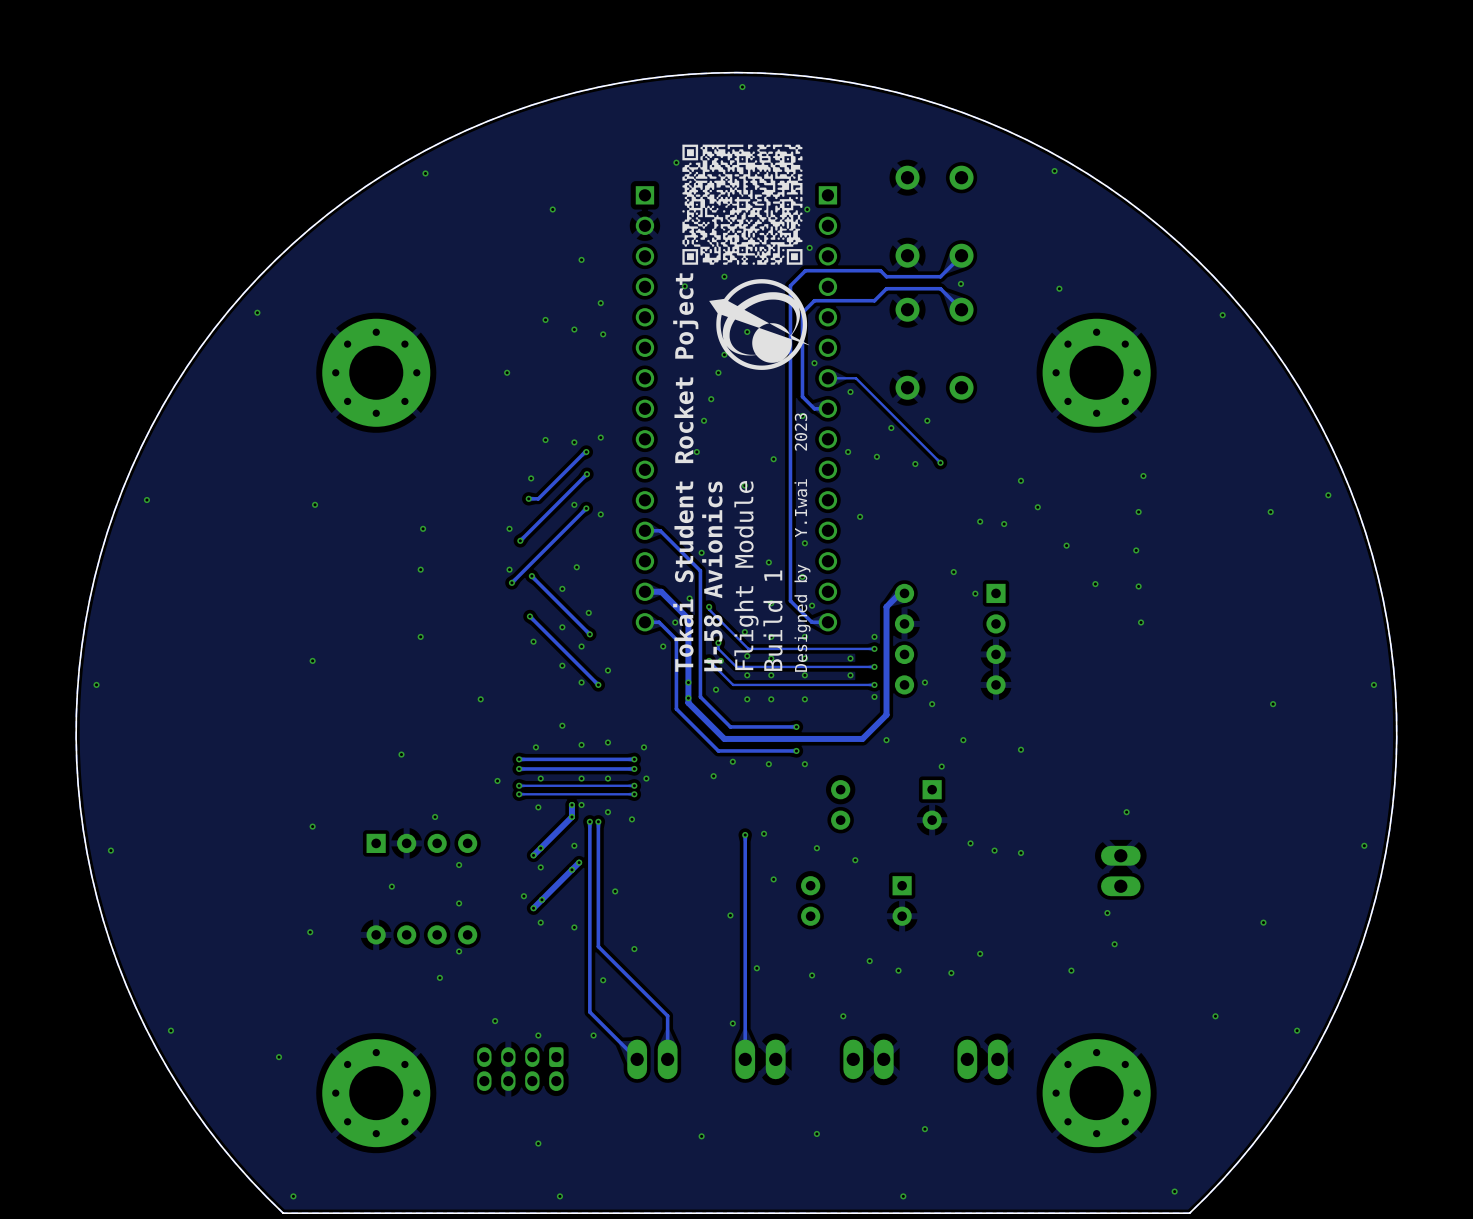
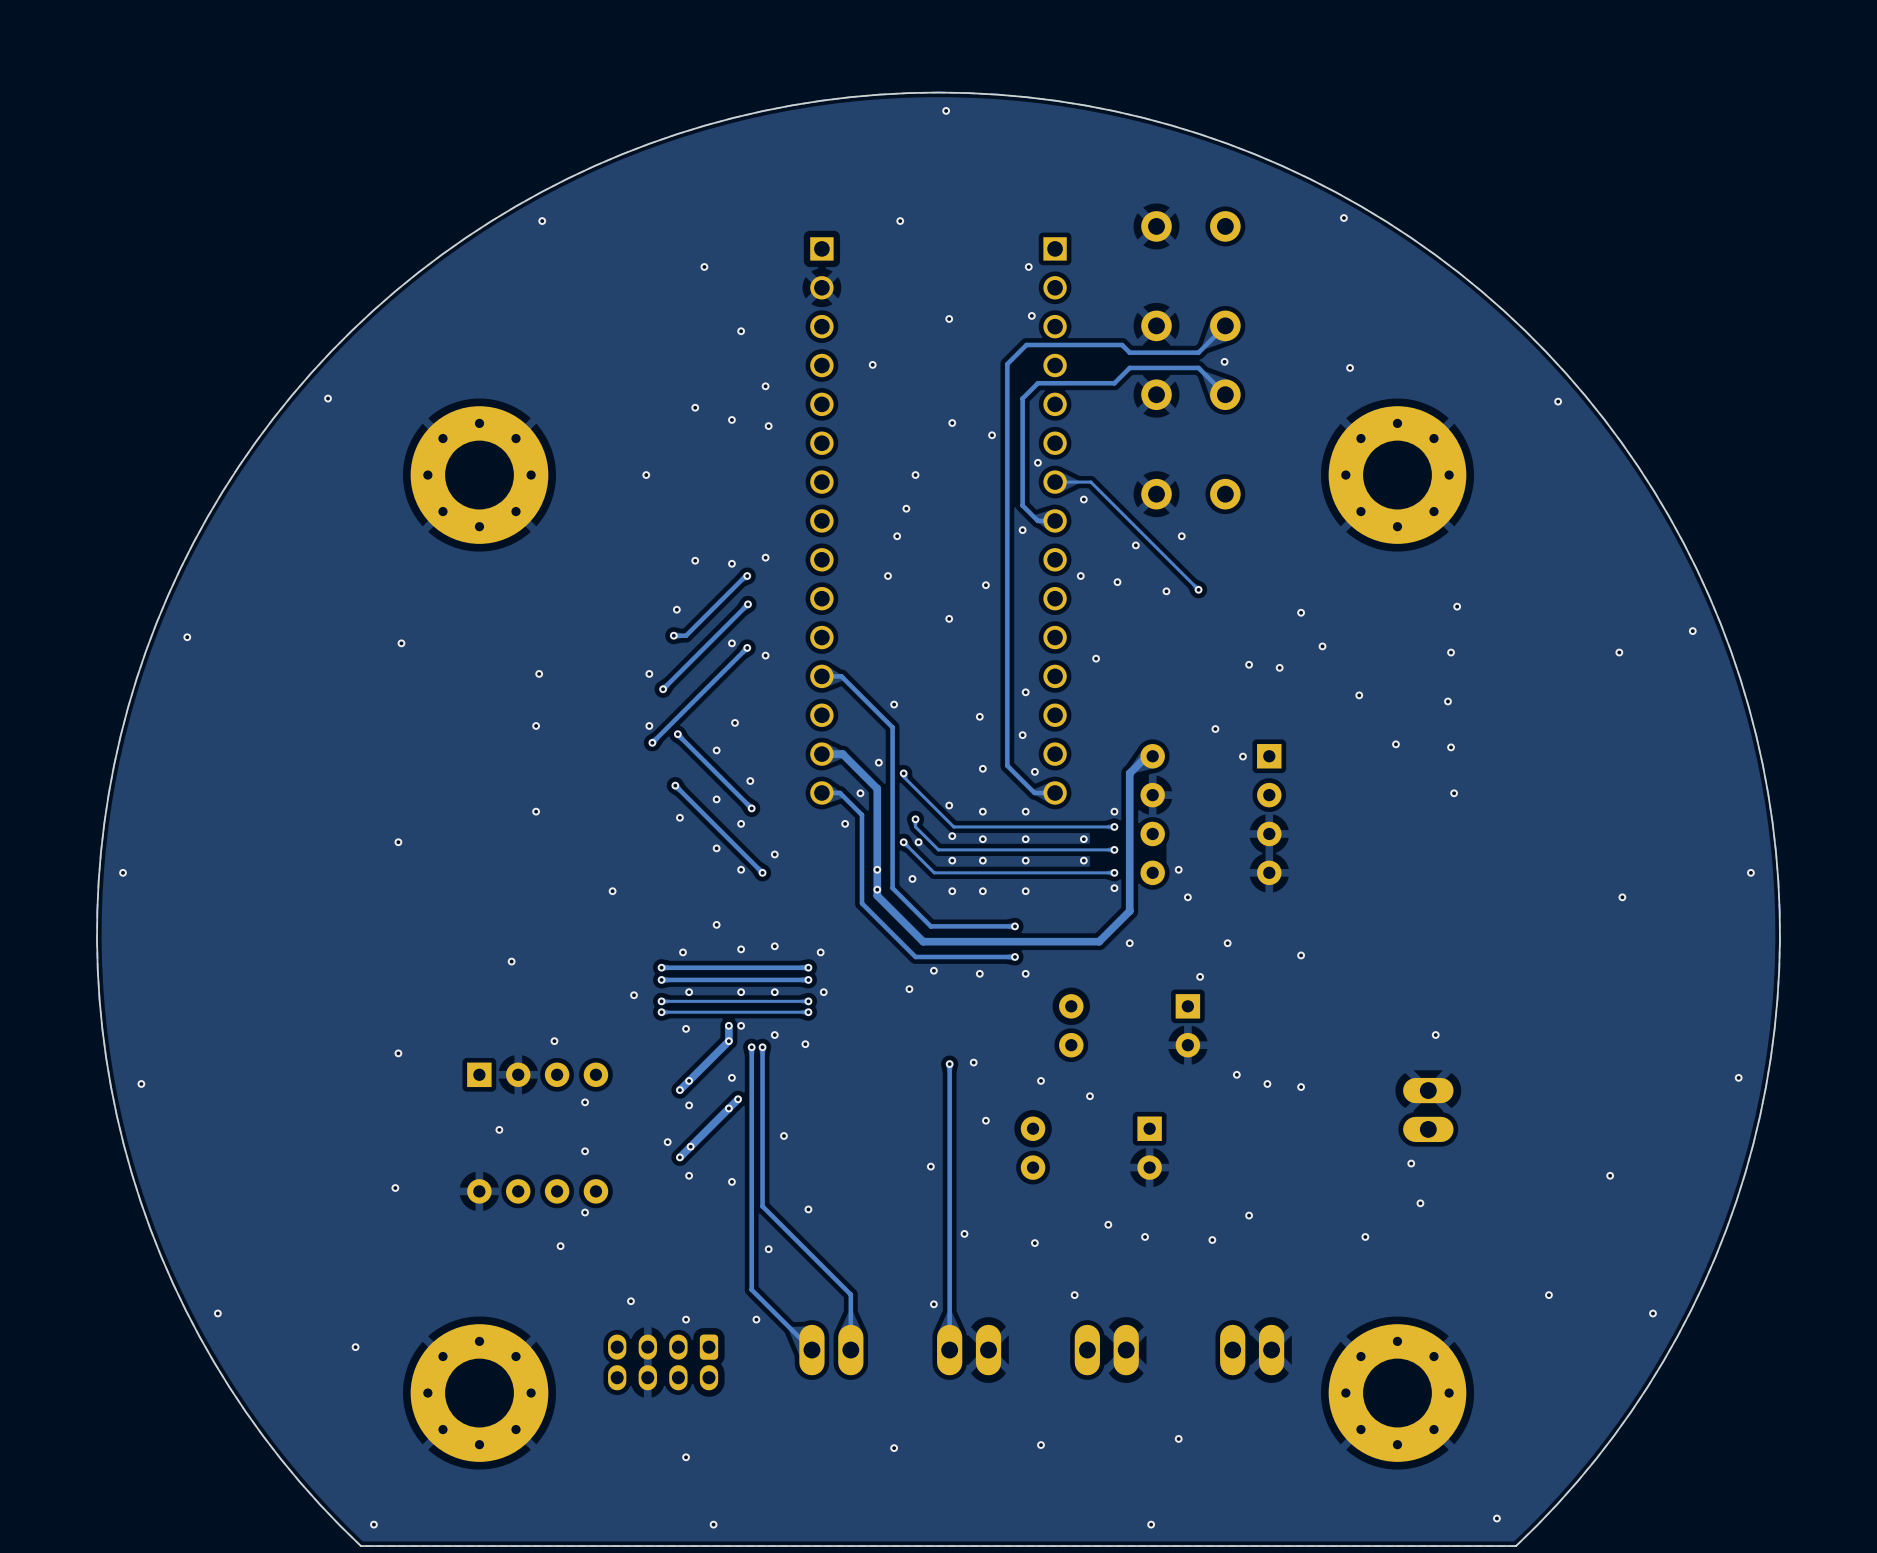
drawing: [682, 144, 810, 370] -> none
via position: (676, 162) -> (900, 221)
via position: (724, 276) -> (949, 318)
via: (724, 354) -> none
text: Tokai Student Rocket Poject (685, 472) -> none
text: Designed by Y.Iwai 2023 (802, 542) -> none
text: Flight Module (746, 575) -> none
text: H-58 Avionics (712, 576) -> none
text: Build 1 (772, 620) -> none

